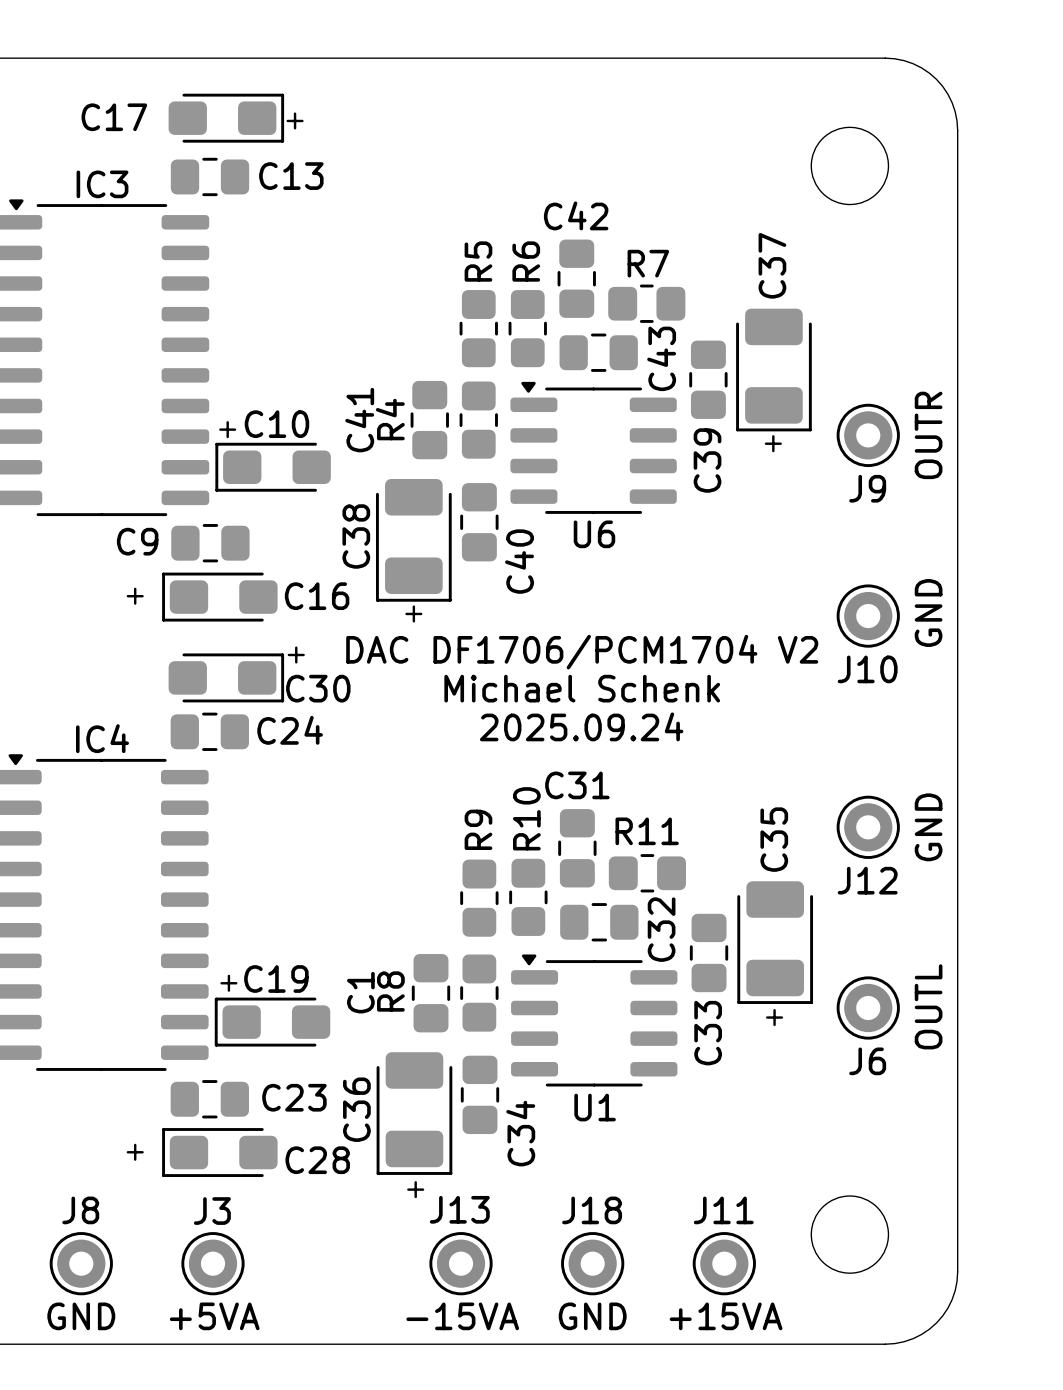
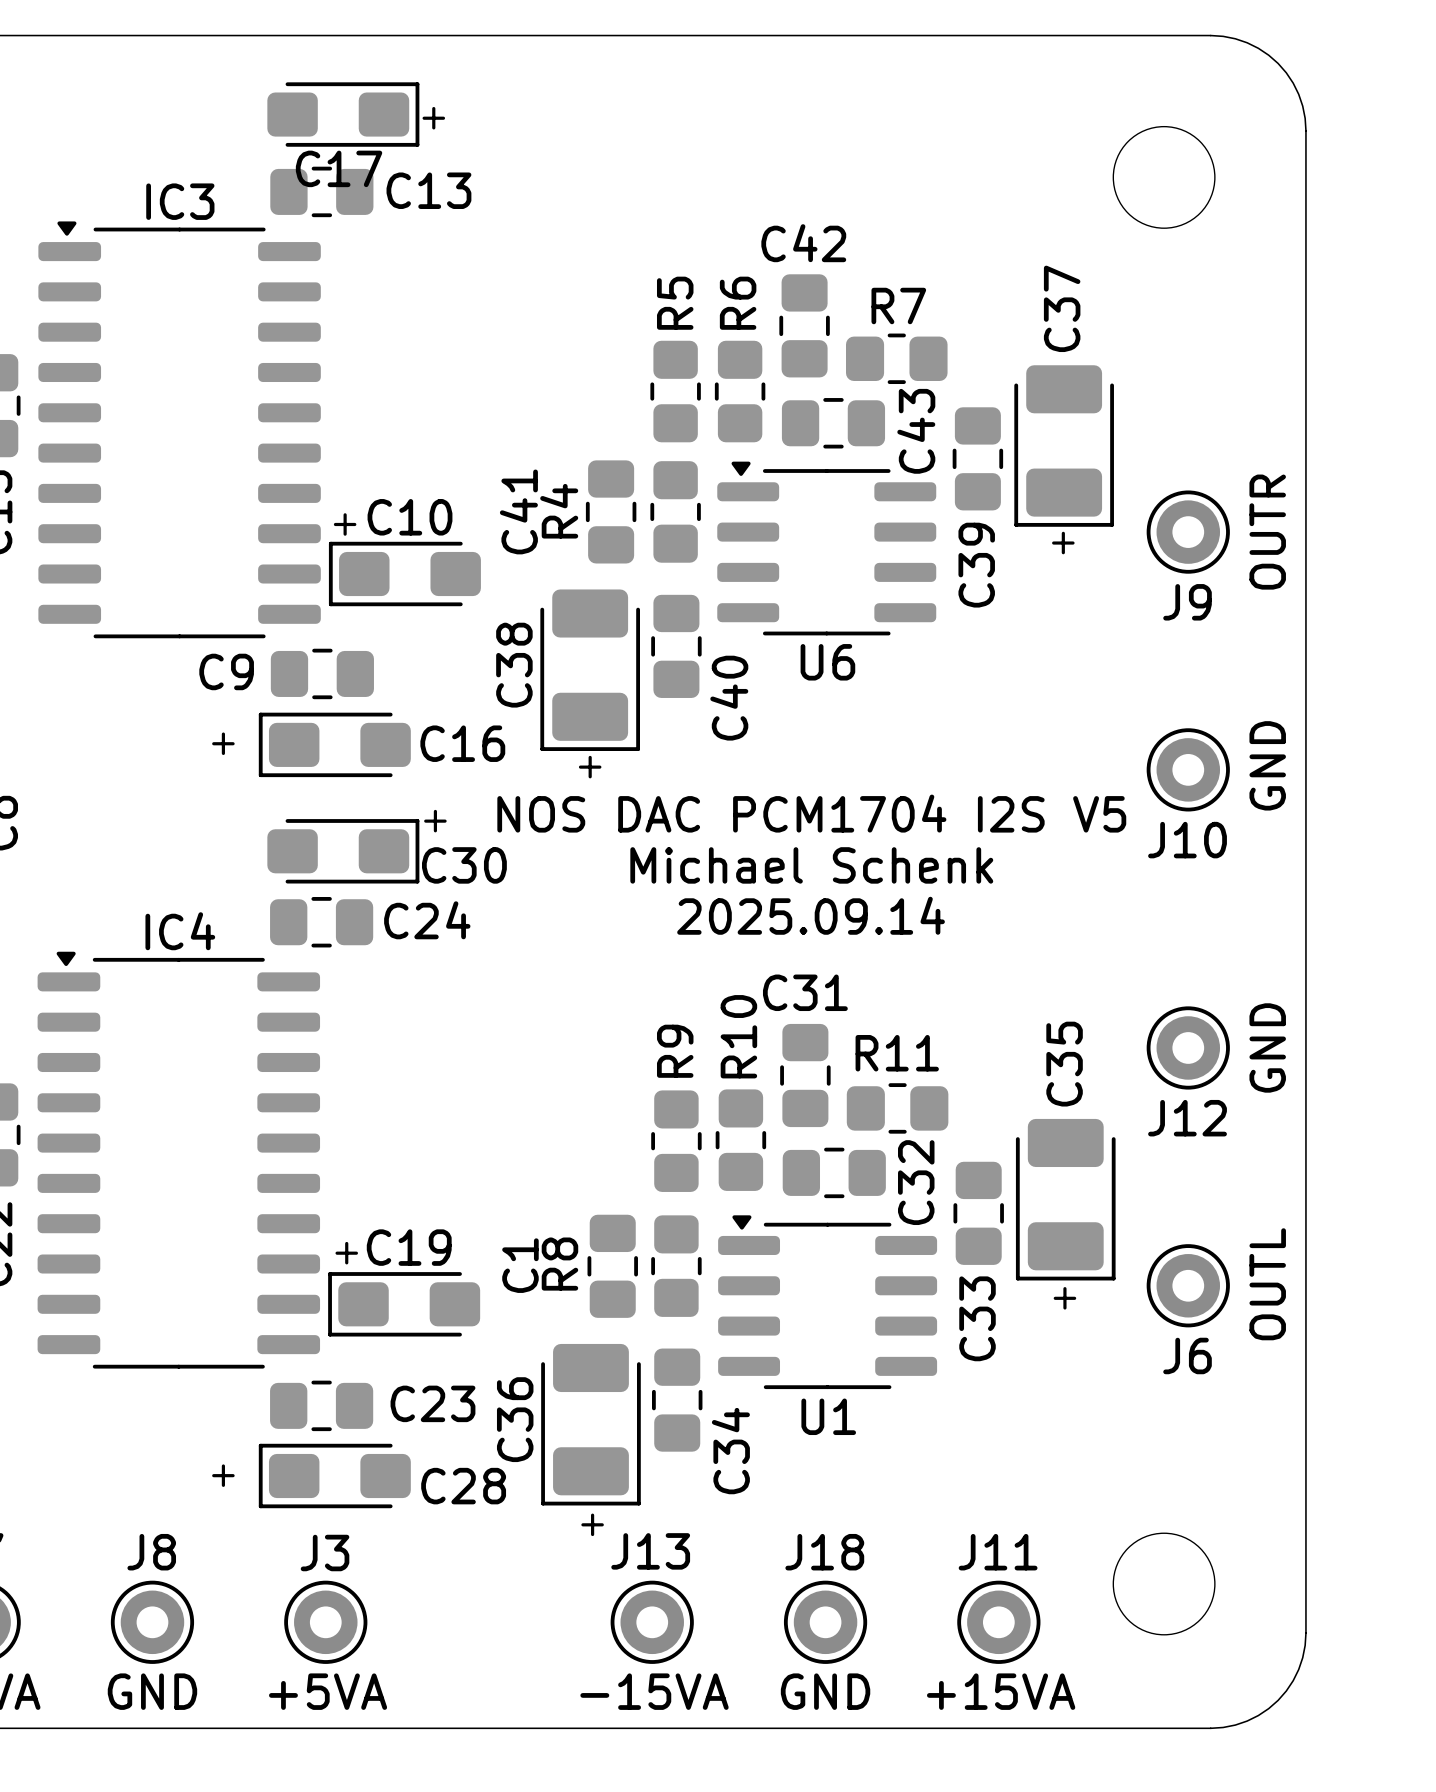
C17 name position: C17 (114, 117) -> C17 (339, 168)
text: DAC DF1706/PCM1704 V2 (582, 652) -> NOS DAC PCM1704 I2S V5 (811, 813)
text: 2025.09.24 (581, 726) -> 2025.09.14 (811, 915)

